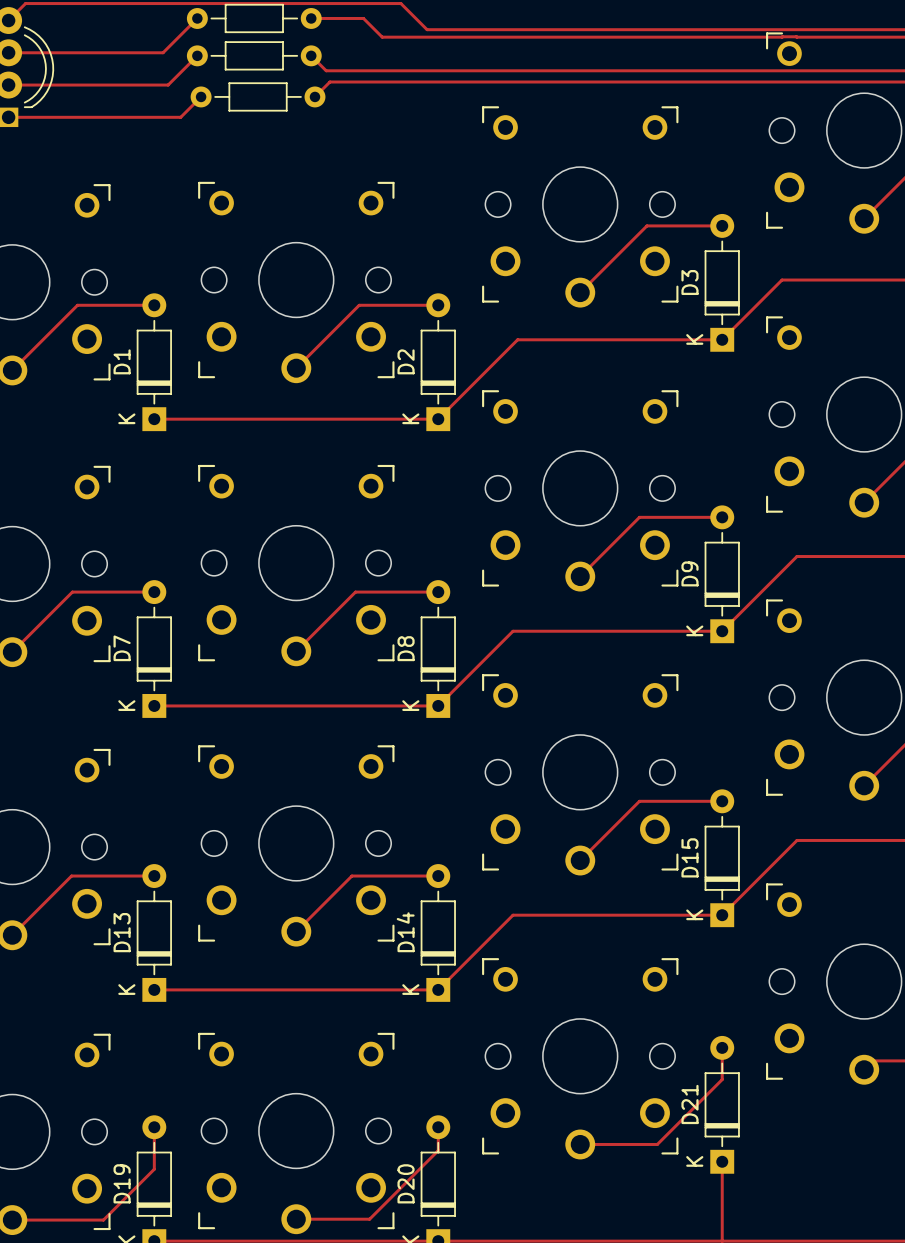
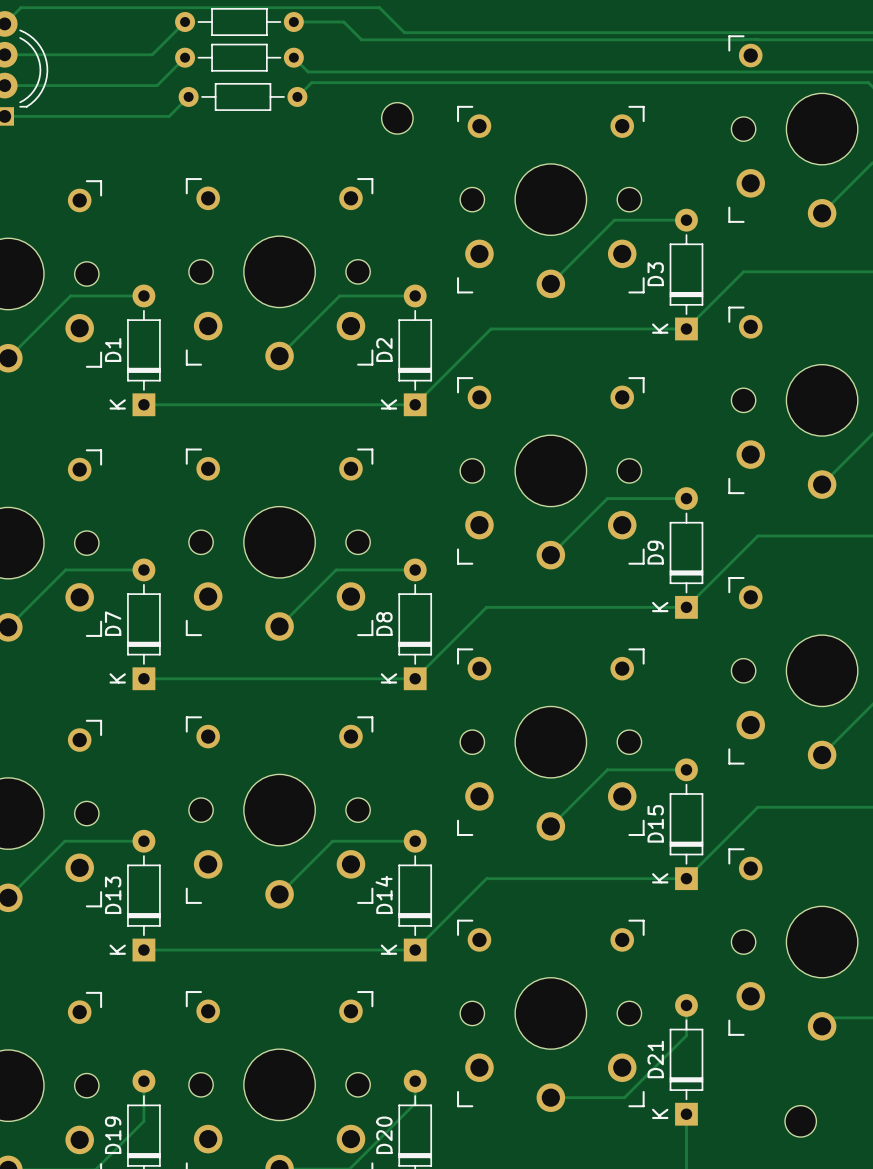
part: none -> (397, 118)
part: none -> (800, 1121)

